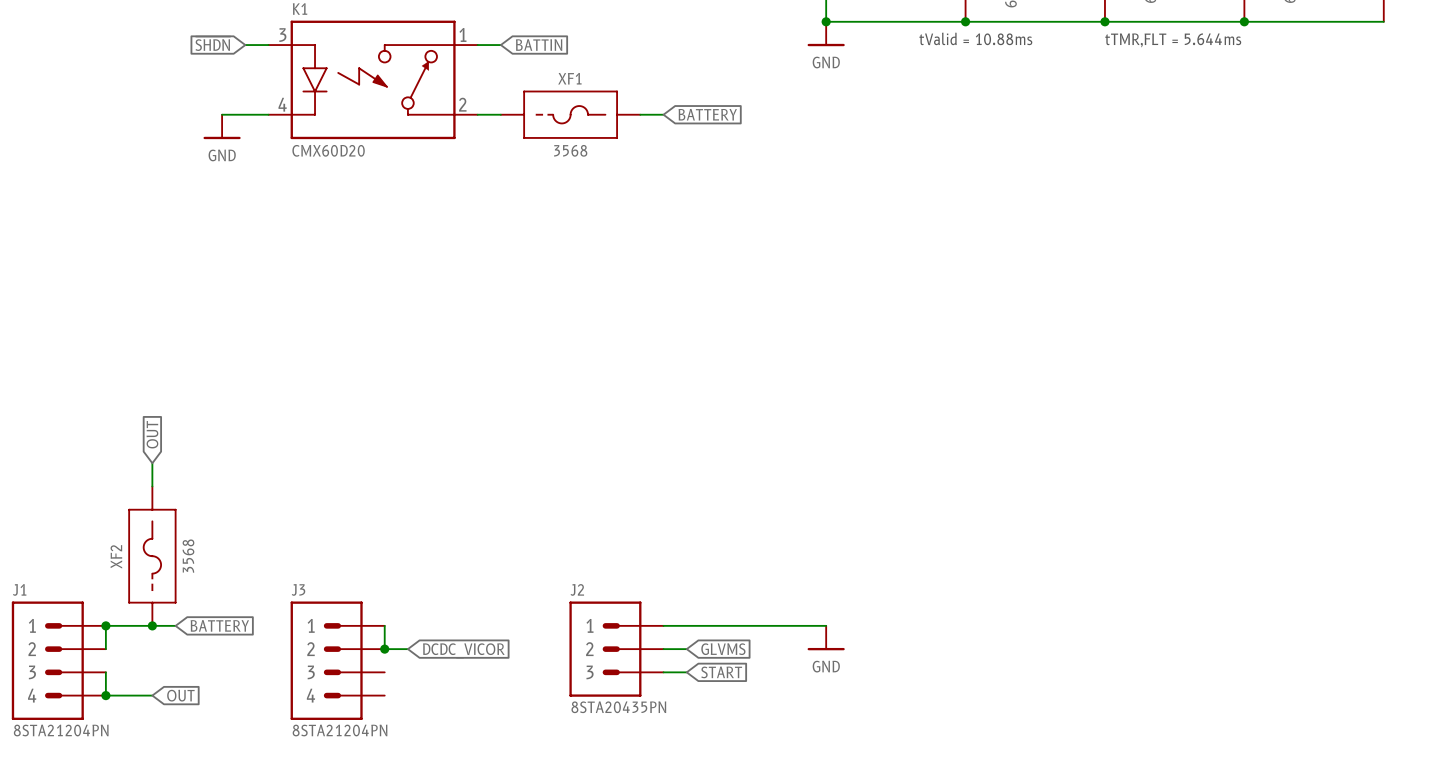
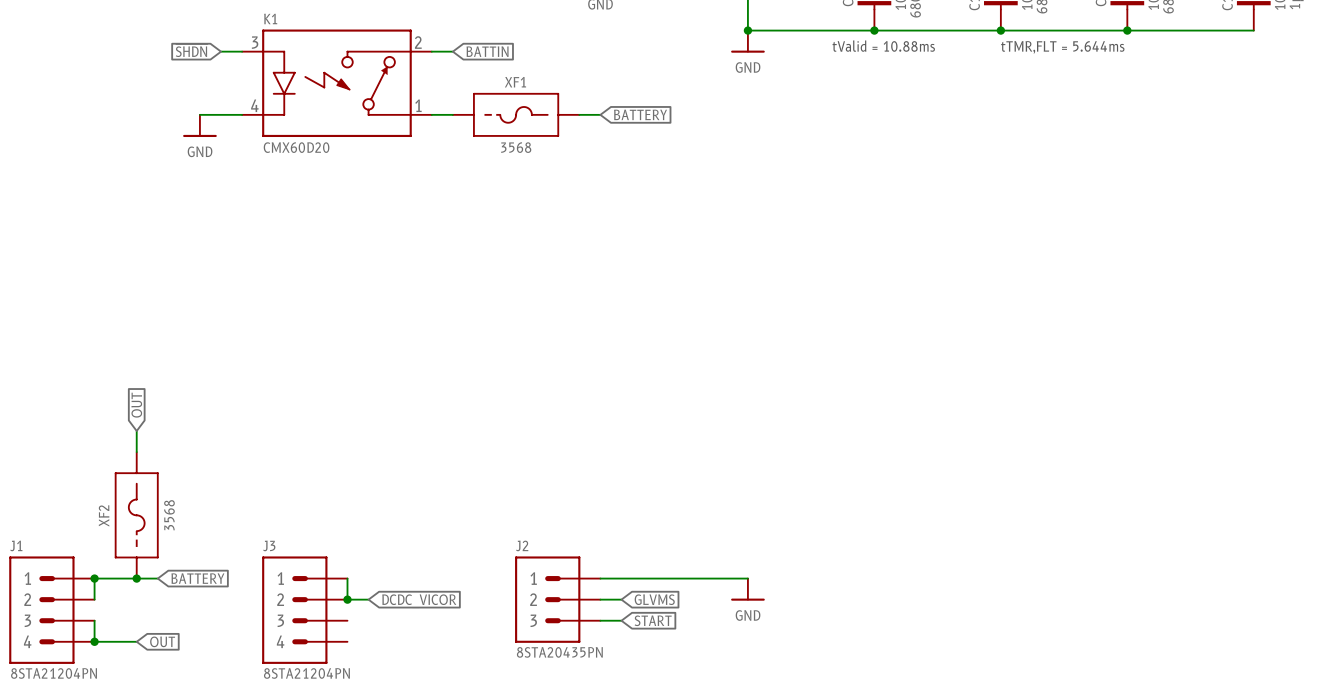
K1 pin number: 1 (462, 34) -> 2 (418, 42)
K1 pin number: 2 (462, 104) -> 1 (418, 105)

